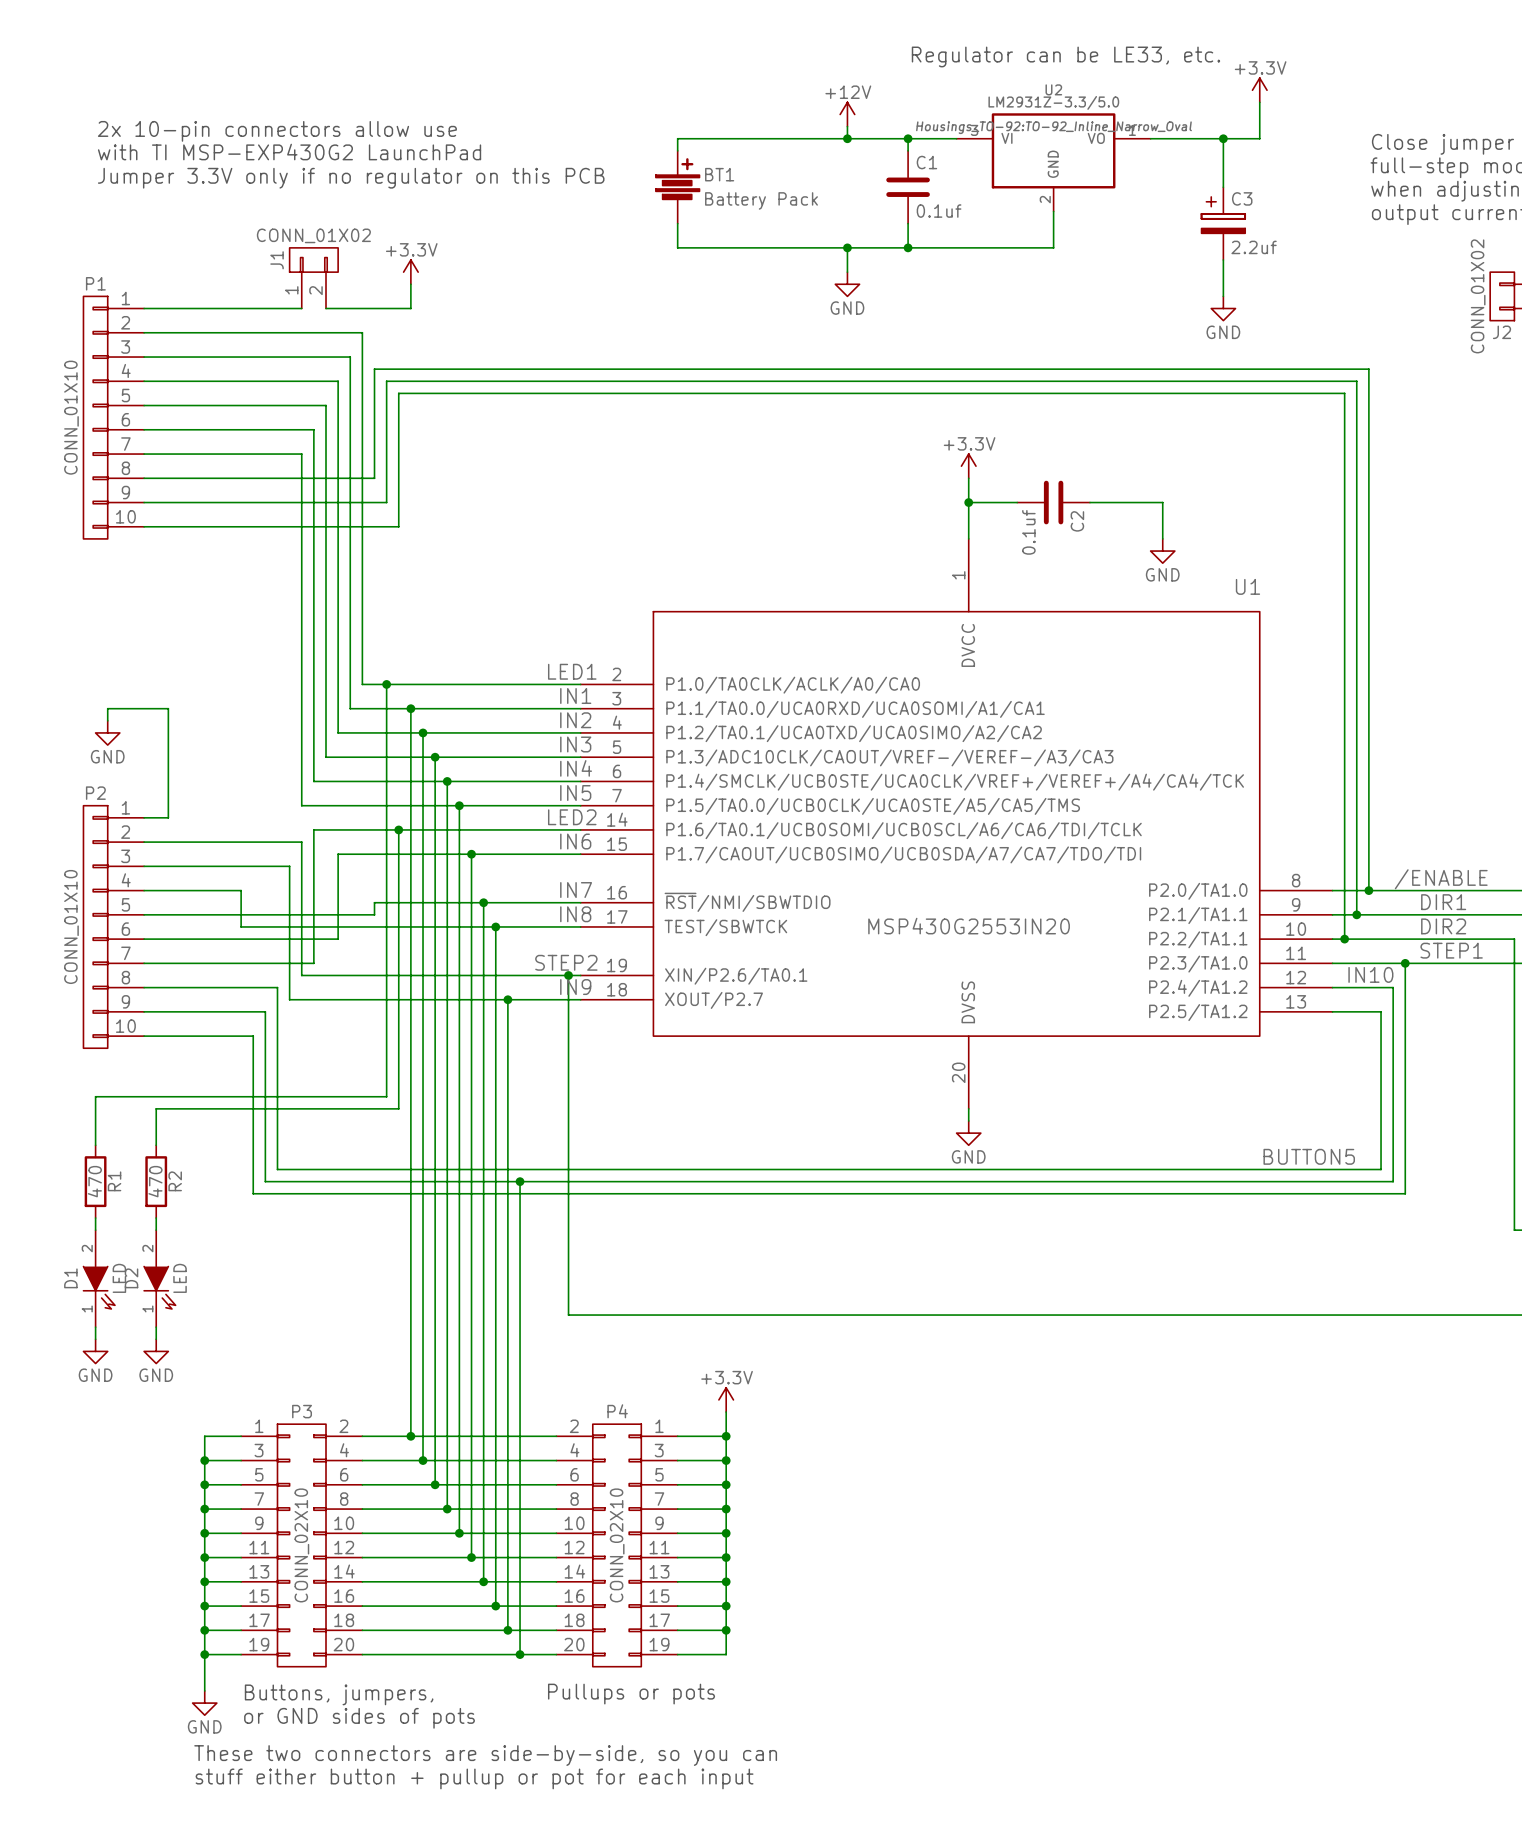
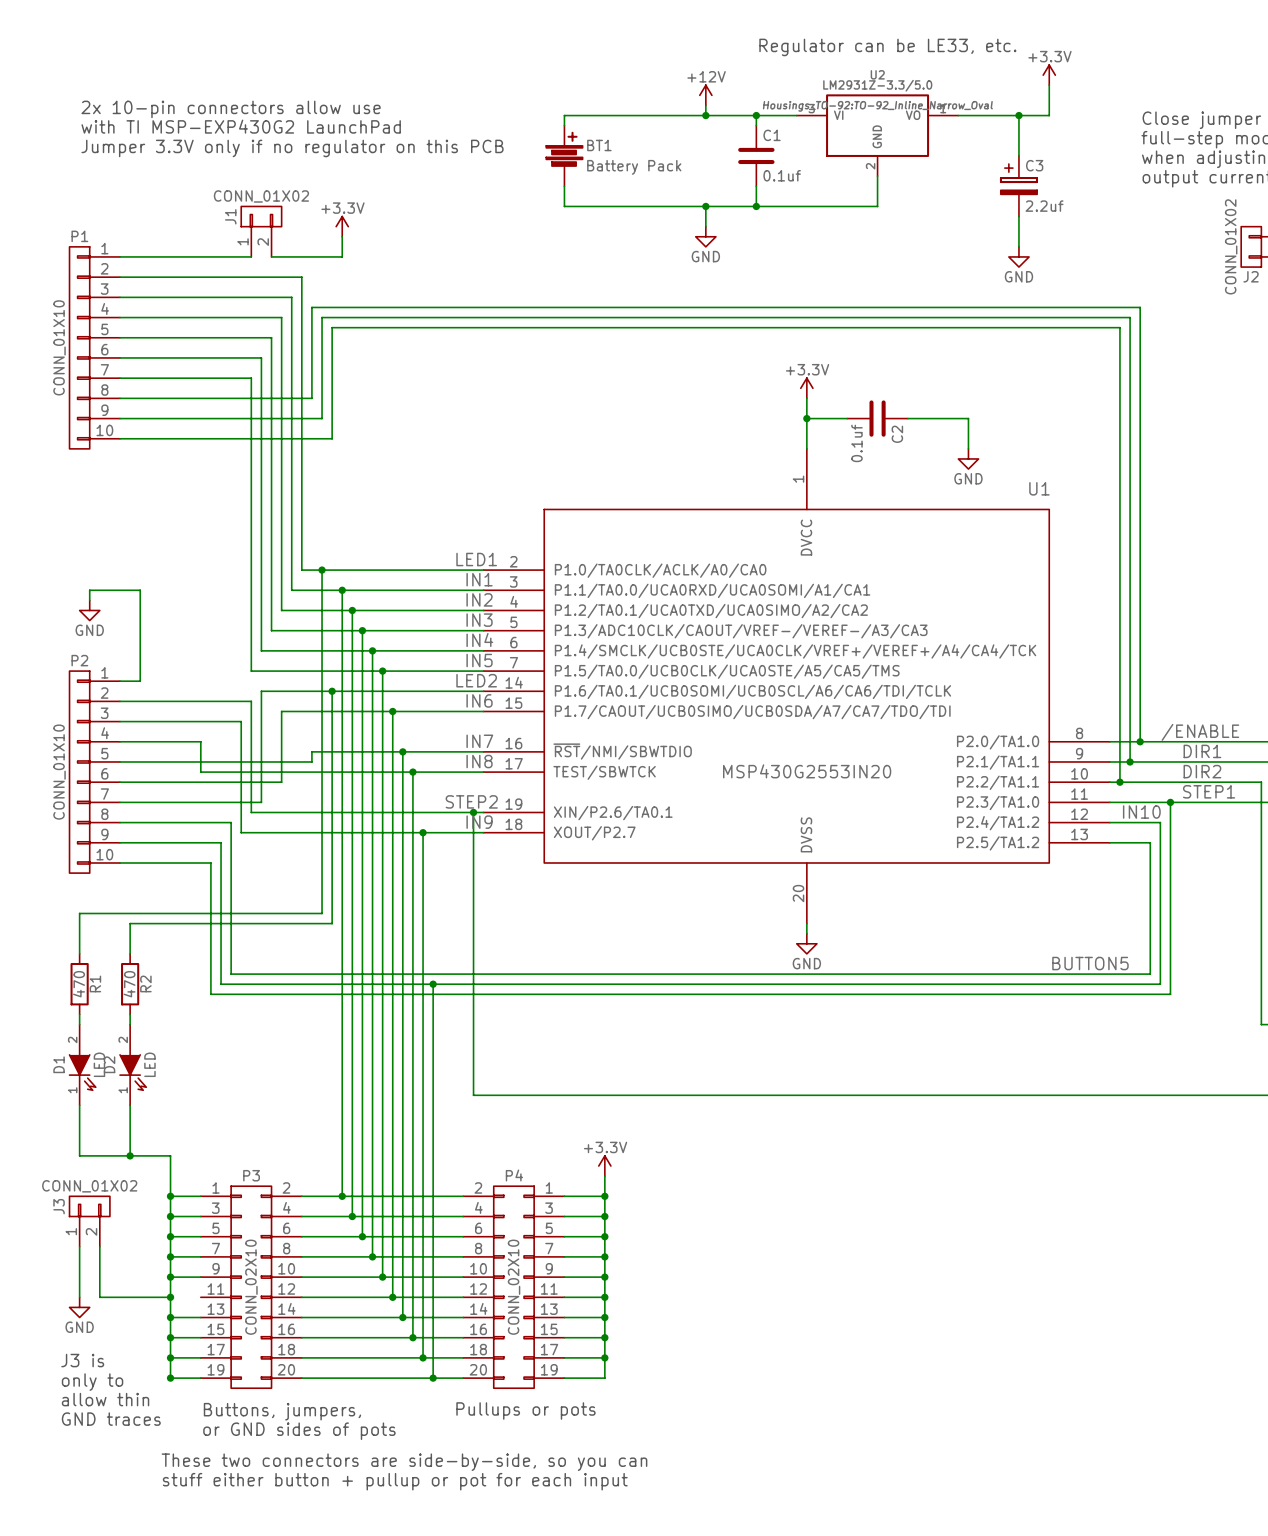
wire: none -> (79, 1115) (79, 1155) (170, 1155) (170, 1196)
wire: none -> (130, 1115) (130, 1155)
power symbol: GND (95, 1351) -> none
power symbol: GND (156, 1351) -> none
junction: none -> (130, 1155)
junction: none -> (170, 1196)
J3: none -> CONN_01X02 (89, 1221)
wire: none -> (79, 1246) (79, 1297)
wire: (204, 1557) (241, 1557) -> (170, 1297) (99, 1297) (99, 1246)
power symbol: none -> GND (79, 1307)
text: none -> J3 is (82, 1360)
wire: (204, 1654) (204, 1690) -> none
text: none -> only to (92, 1382)
text: none -> allow thin (105, 1399)
text: none -> GND traces (111, 1419)
power symbol: GND (204, 1703) -> none

